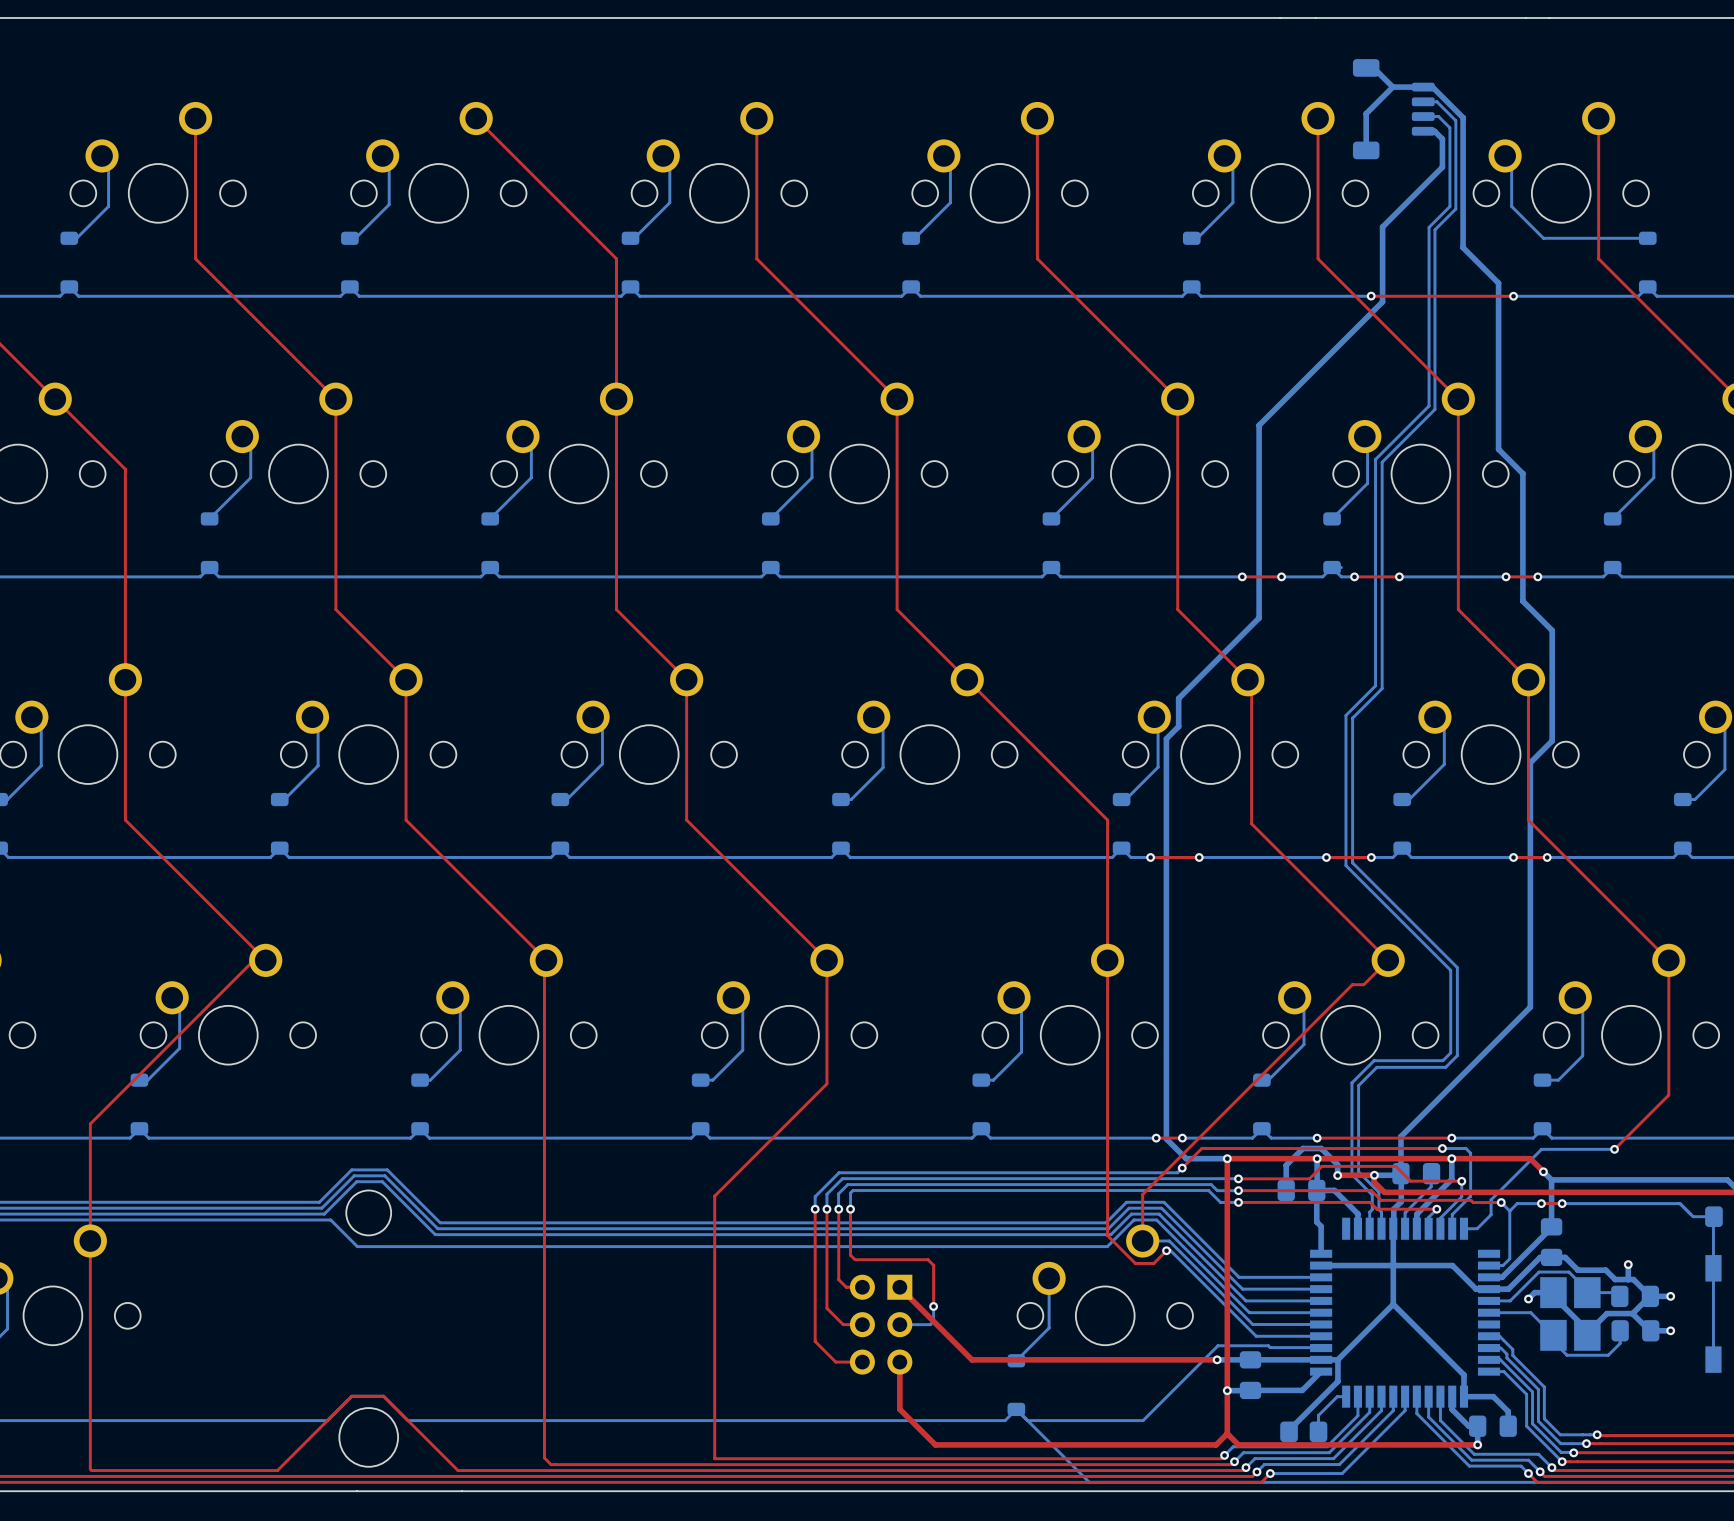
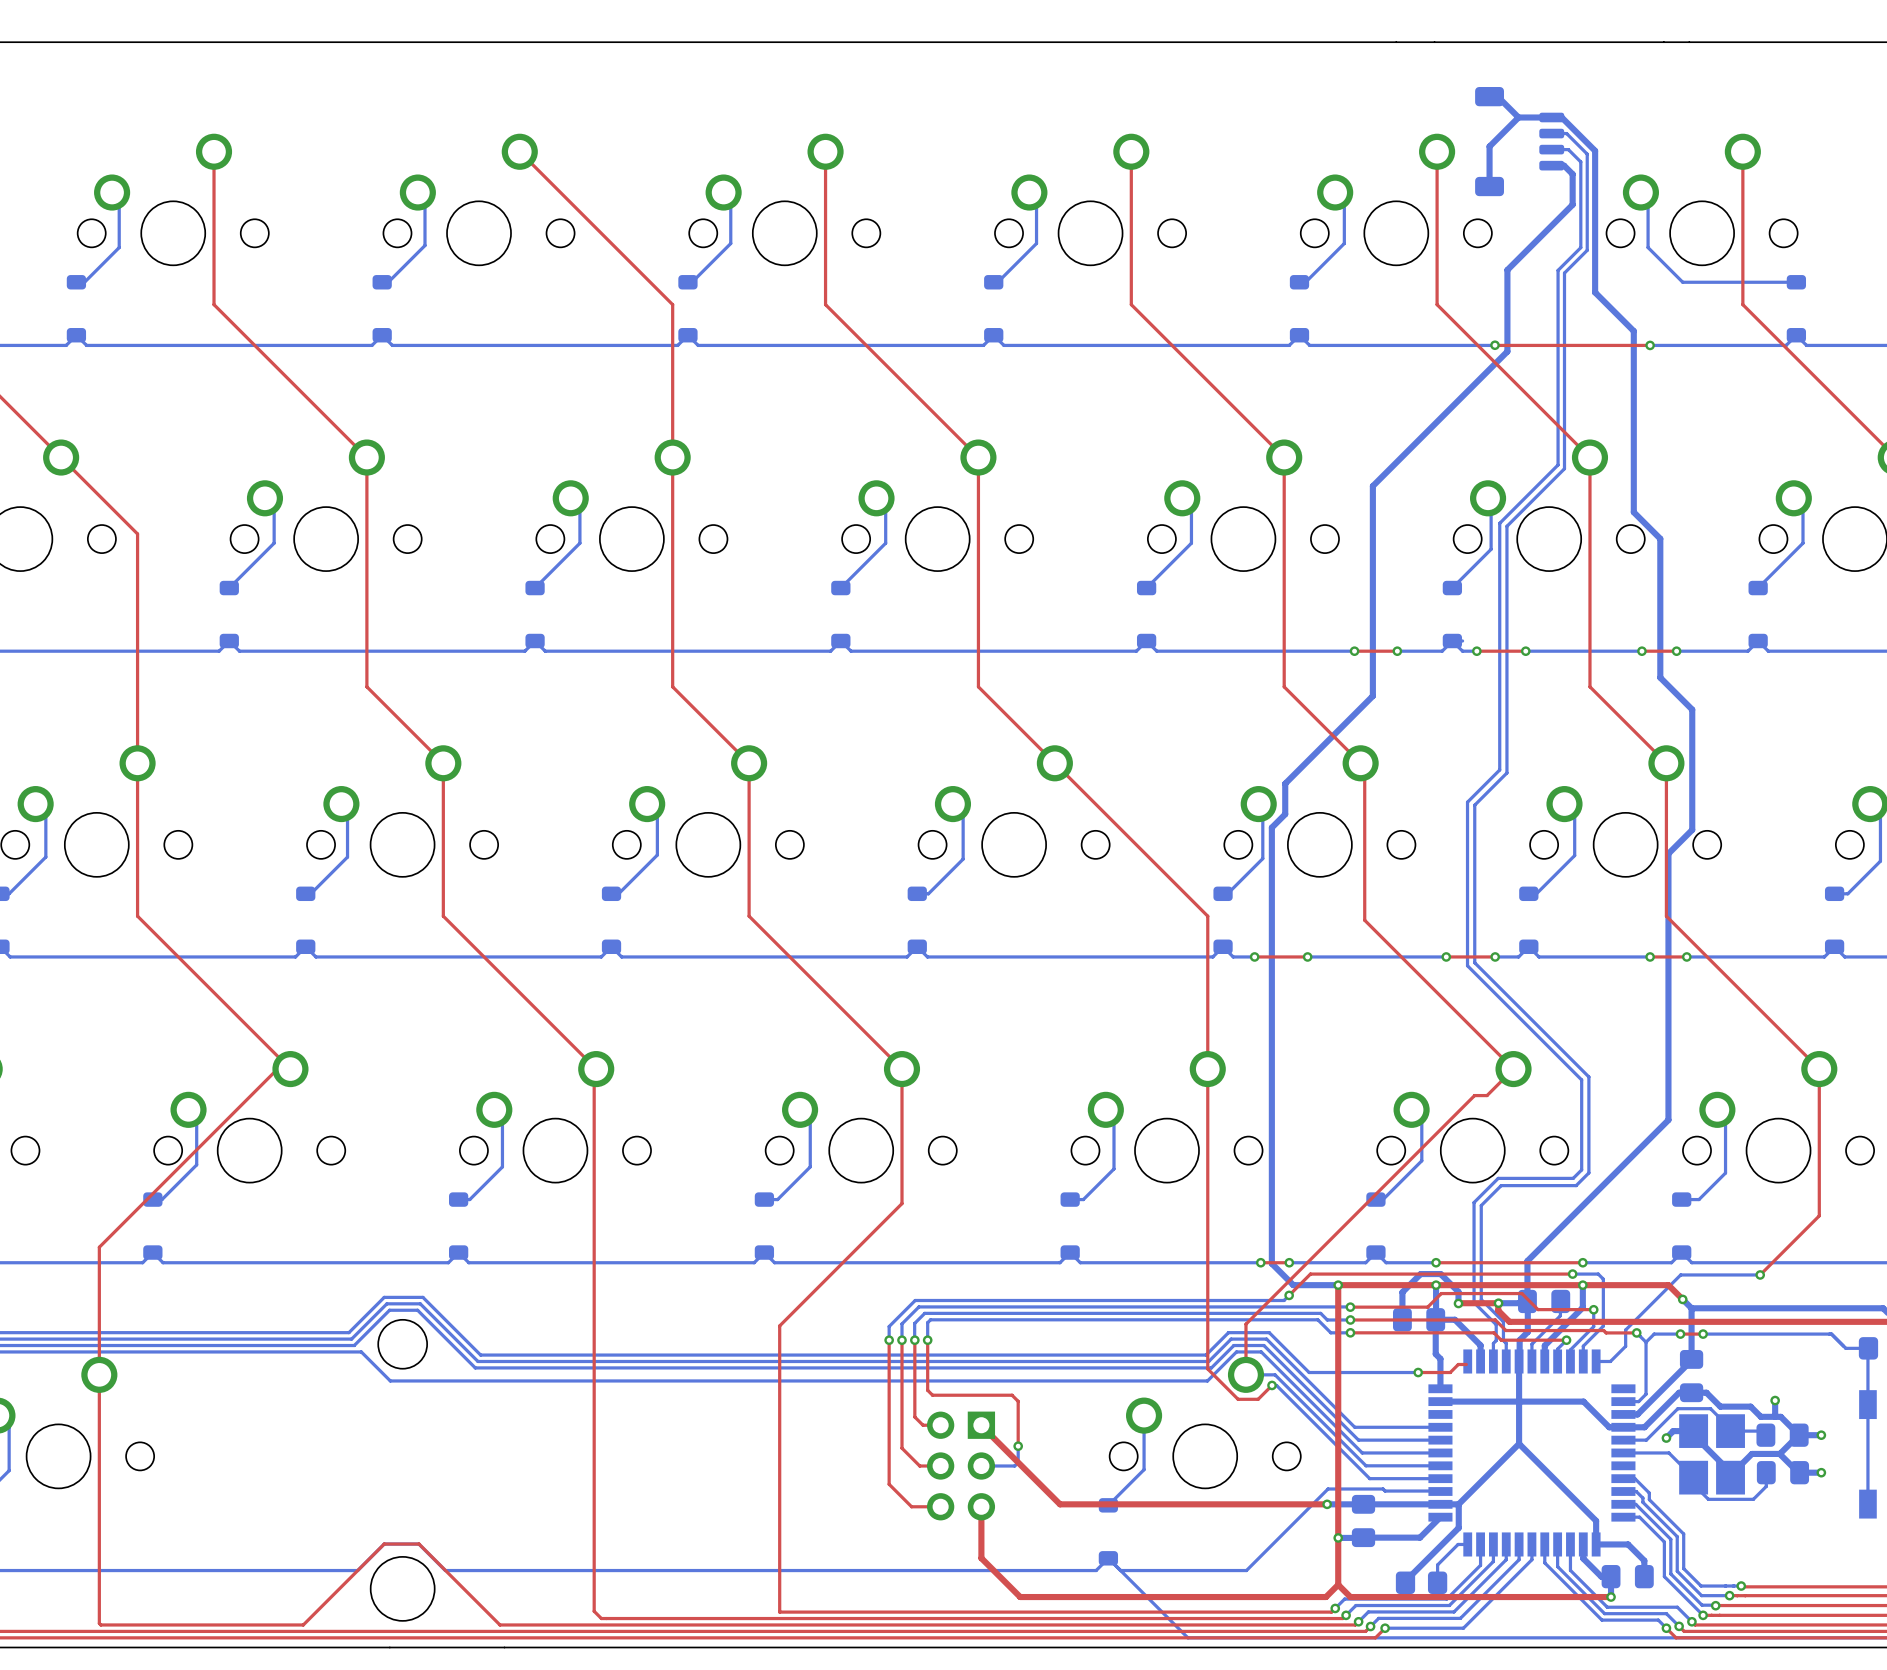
top track: none -> (1466, 1364) (1458, 1364) (1450, 1372) (1418, 1372)
bottom track: (1200, 1238) (1239, 1277) (1321, 1277) -> (1309, 1372) (1418, 1372)
via: none -> (1418, 1372)

